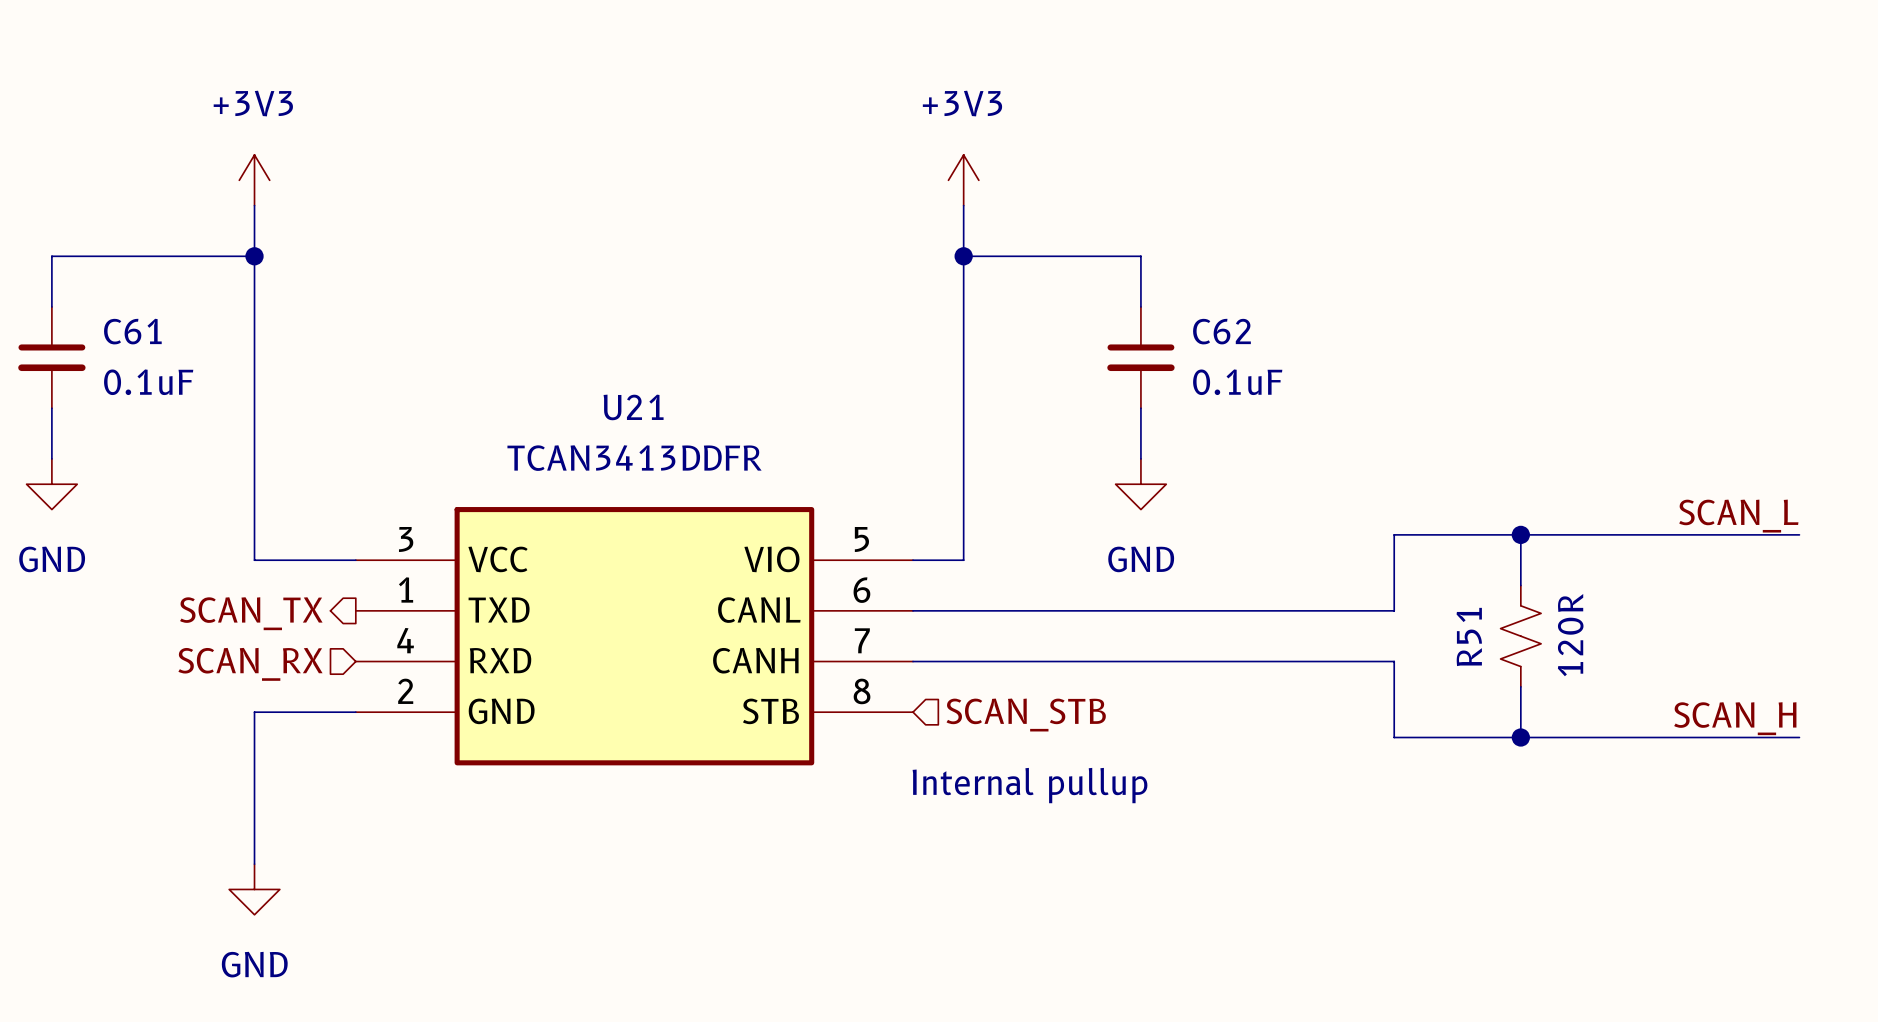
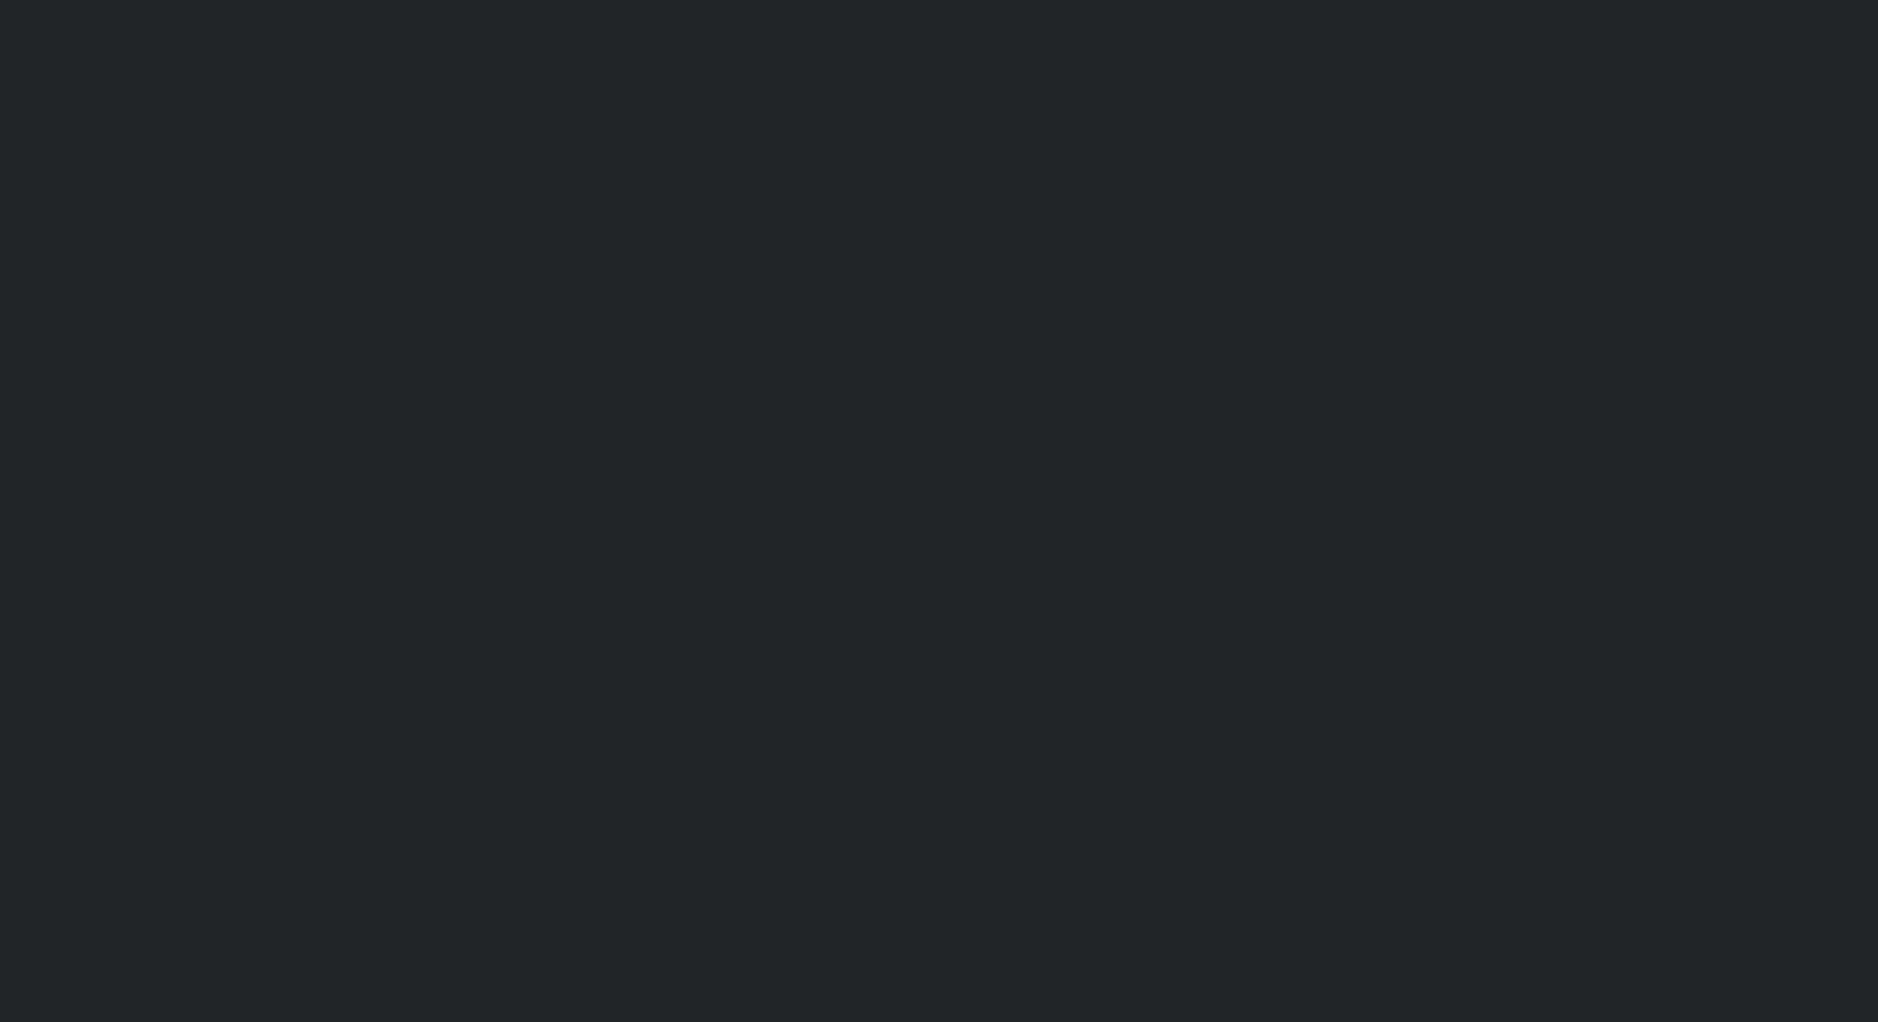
power symbol: +3V3 (254, 180) -> none
power symbol: +3V3 (963, 180) -> none
wire: (254, 205) (254, 560) (355, 560) -> none
wire: (963, 205) (963, 560) (913, 560) -> none
wire: (254, 256) (51, 256) (51, 306) -> none
junction: (254, 256) -> none
wire: (963, 256) (1140, 256) (1140, 306) -> none
junction: (963, 256) -> none
C61: 0.1uF (51, 357) -> none
C62: 0.1uF (1140, 357) -> none
wire: (51, 408) (51, 458) -> none
wire: (1140, 408) (1140, 458) -> none
power symbol: GND (51, 484) -> none
power symbol: GND (1140, 484) -> none
label: SCAN_L (1738, 516) -> none
wire: (1520, 534) (1520, 585) -> none
junction: (1520, 534) -> none
wire: (1799, 534) (1394, 534) (1394, 610) (913, 610) -> none
hierarchical label: SCAN_TX (251, 613) -> none
U21: TCAN3413DDFR (634, 636) -> none
R51: 120R (1520, 636) -> none
wire: (913, 661) (1394, 661) (1394, 737) (1799, 737) -> none
hierarchical label: SCAN_RX (250, 664) -> none
wire: (1520, 686) (1520, 737) -> none
wire: (355, 712) (254, 712) (254, 864) -> none
hierarchical label: SCAN_STB (1026, 715) -> none
label: SCAN_H (1735, 718) -> none
junction: (1520, 737) -> none
text: Internal pullup (1030, 785) -> none
power symbol: GND (254, 889) -> none

